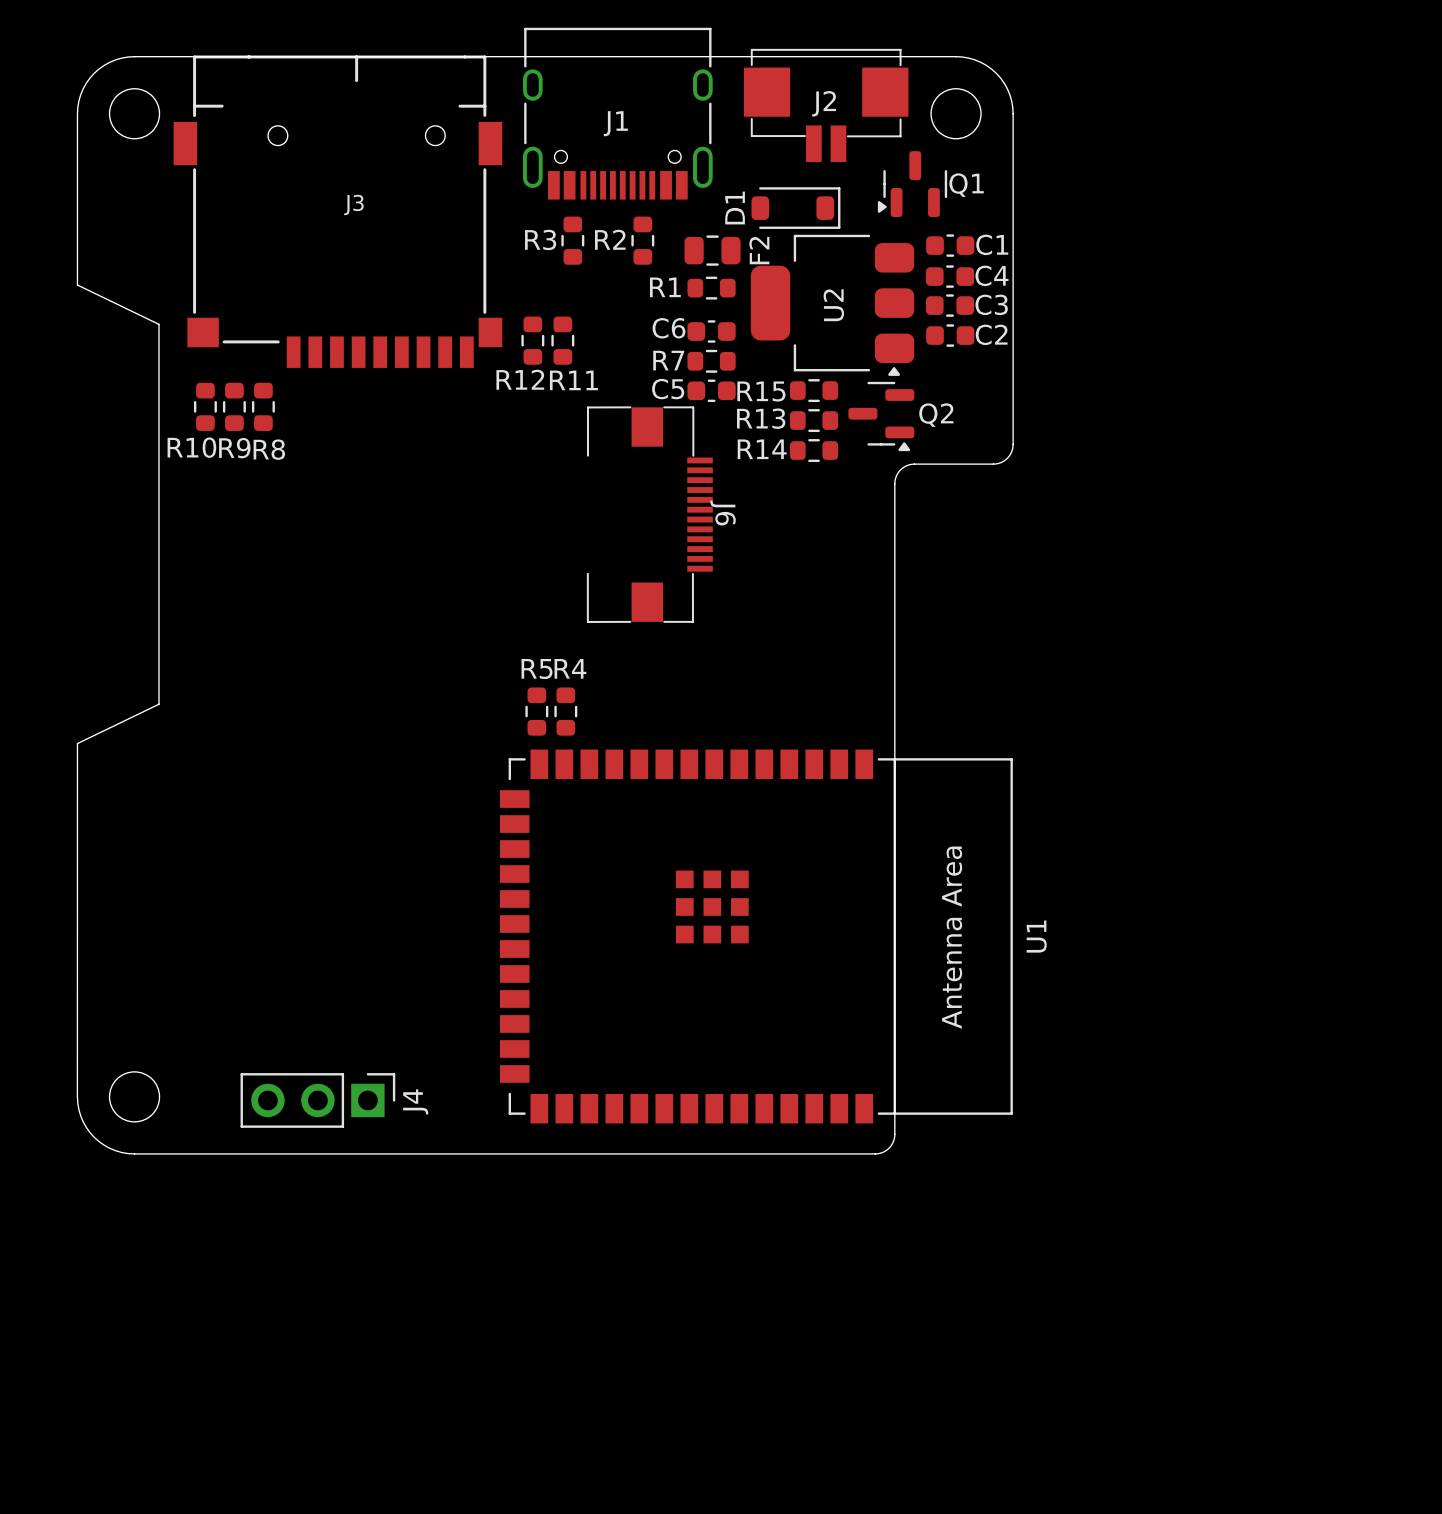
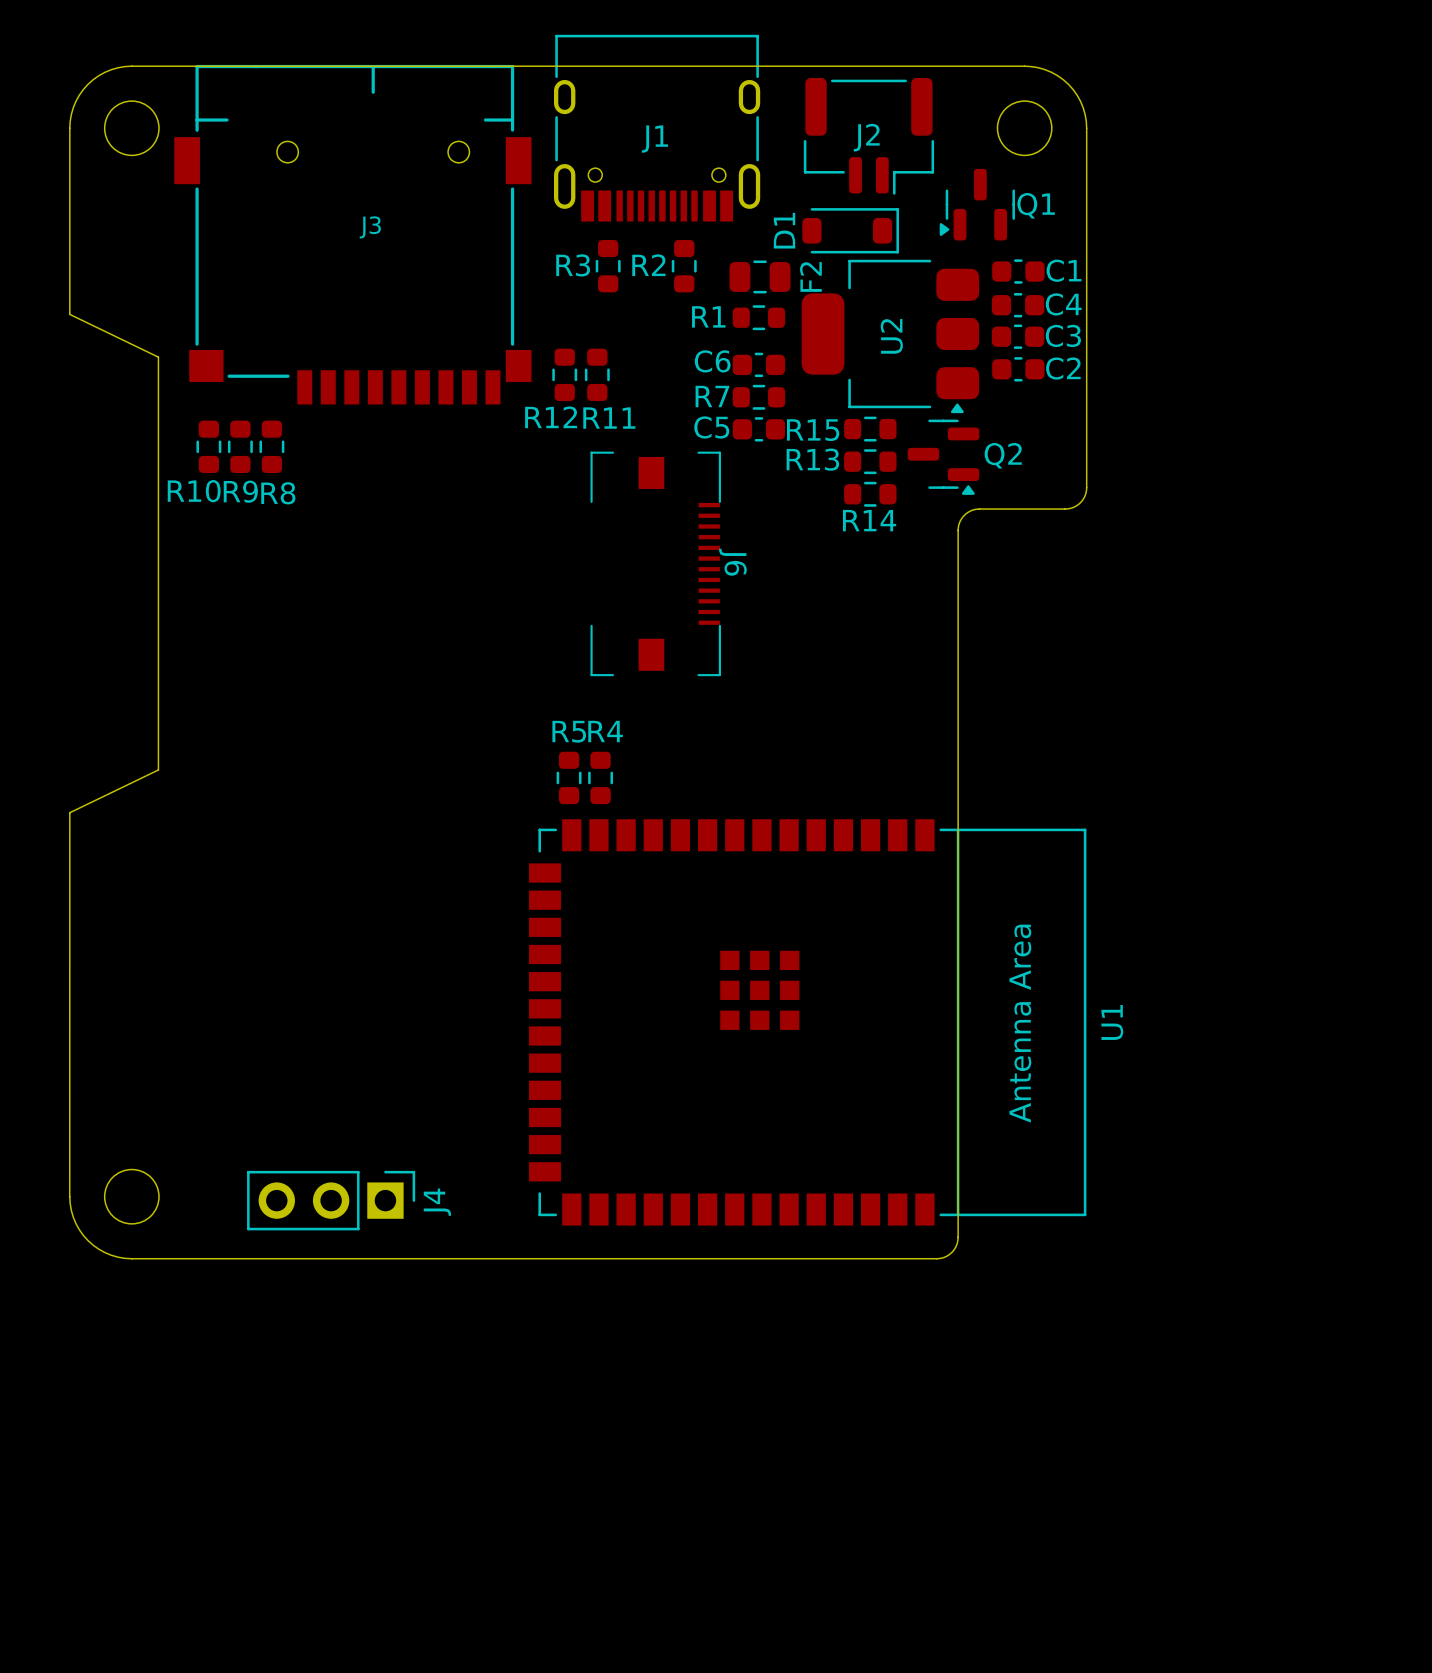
J2 footprint: [743, 48, 909, 163] -> [803, 77, 935, 195]
J6 footprint: [586, 406, 713, 623] -> [590, 451, 721, 677]
R14 name position: R14 (762, 449) -> R14 (869, 520)

